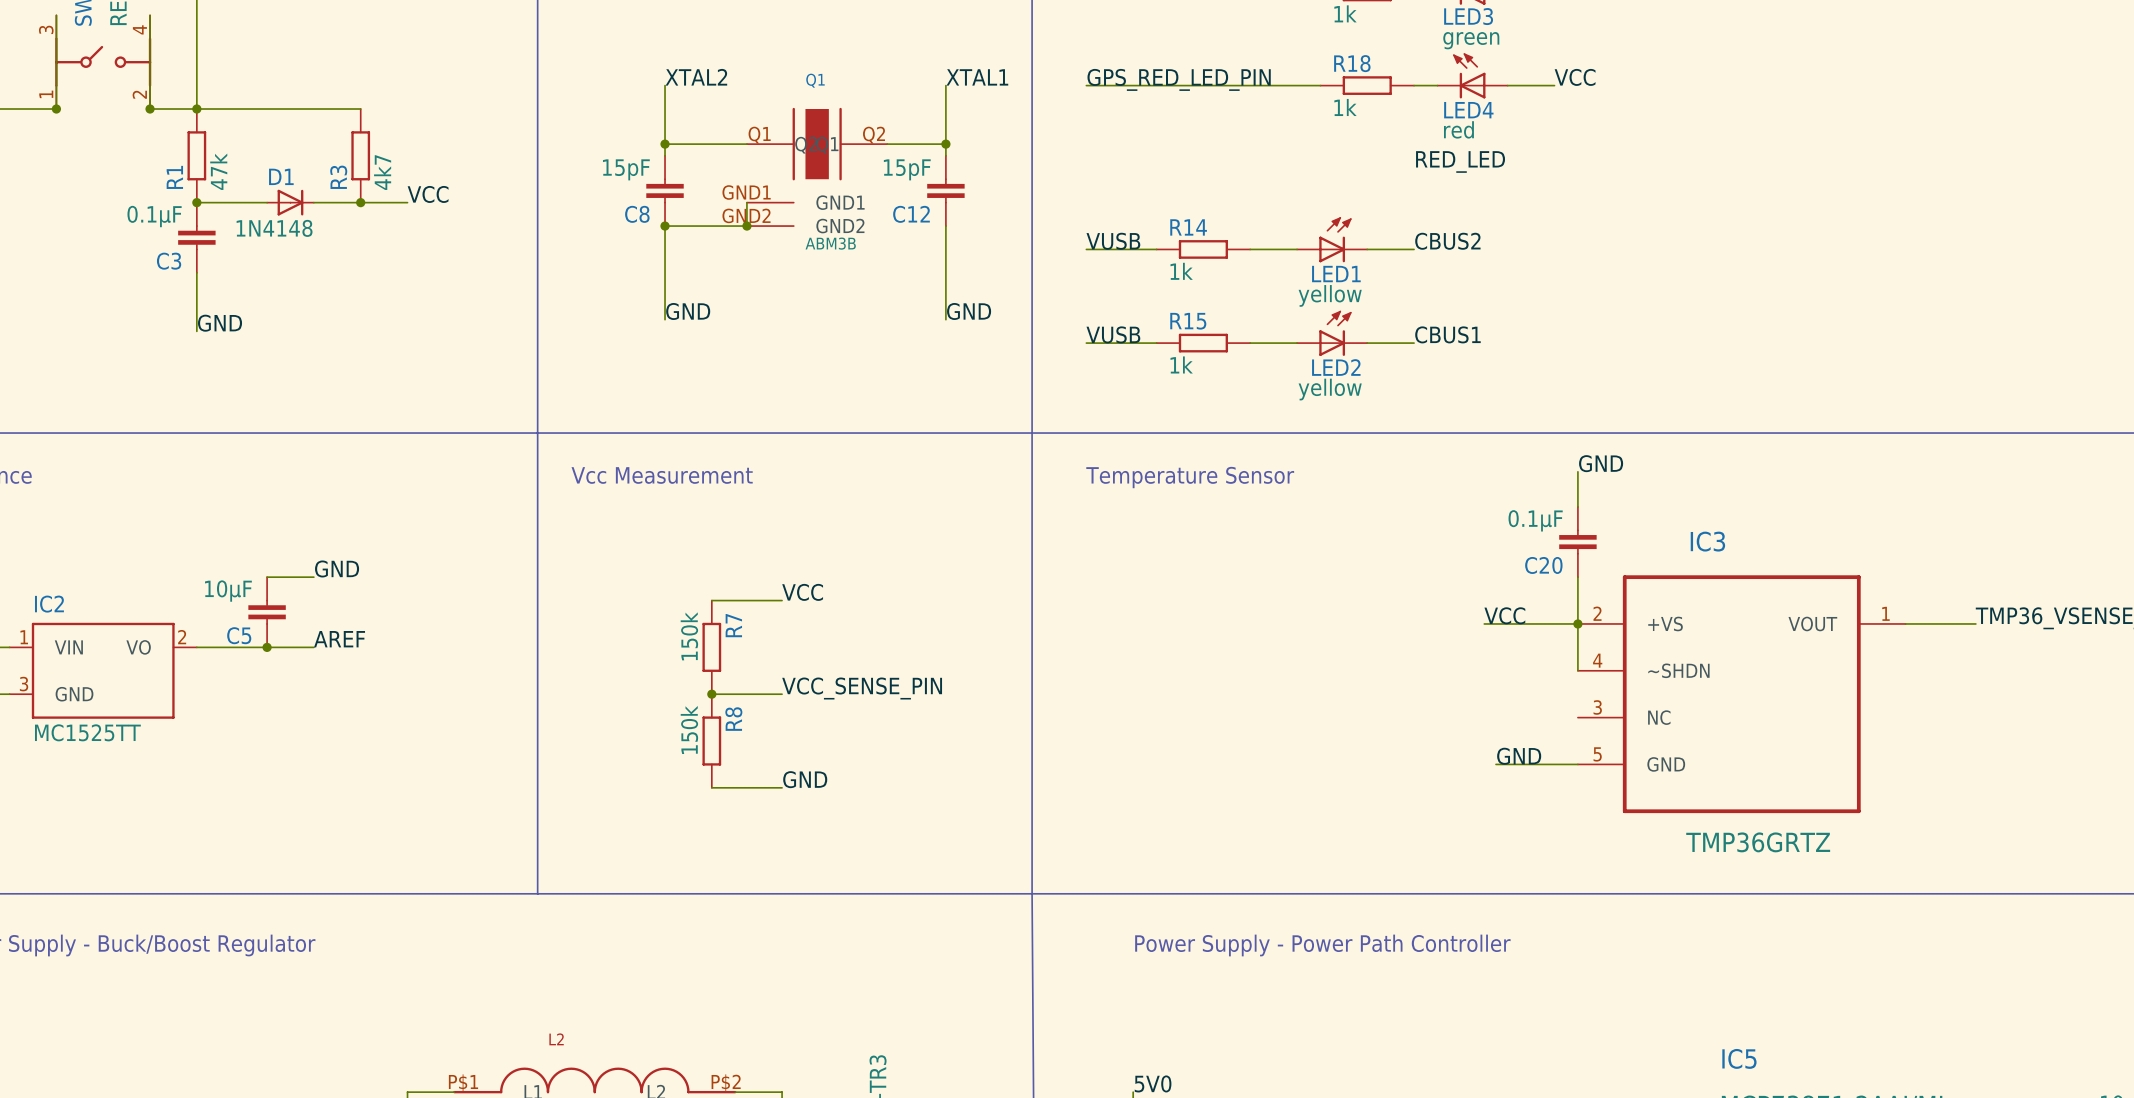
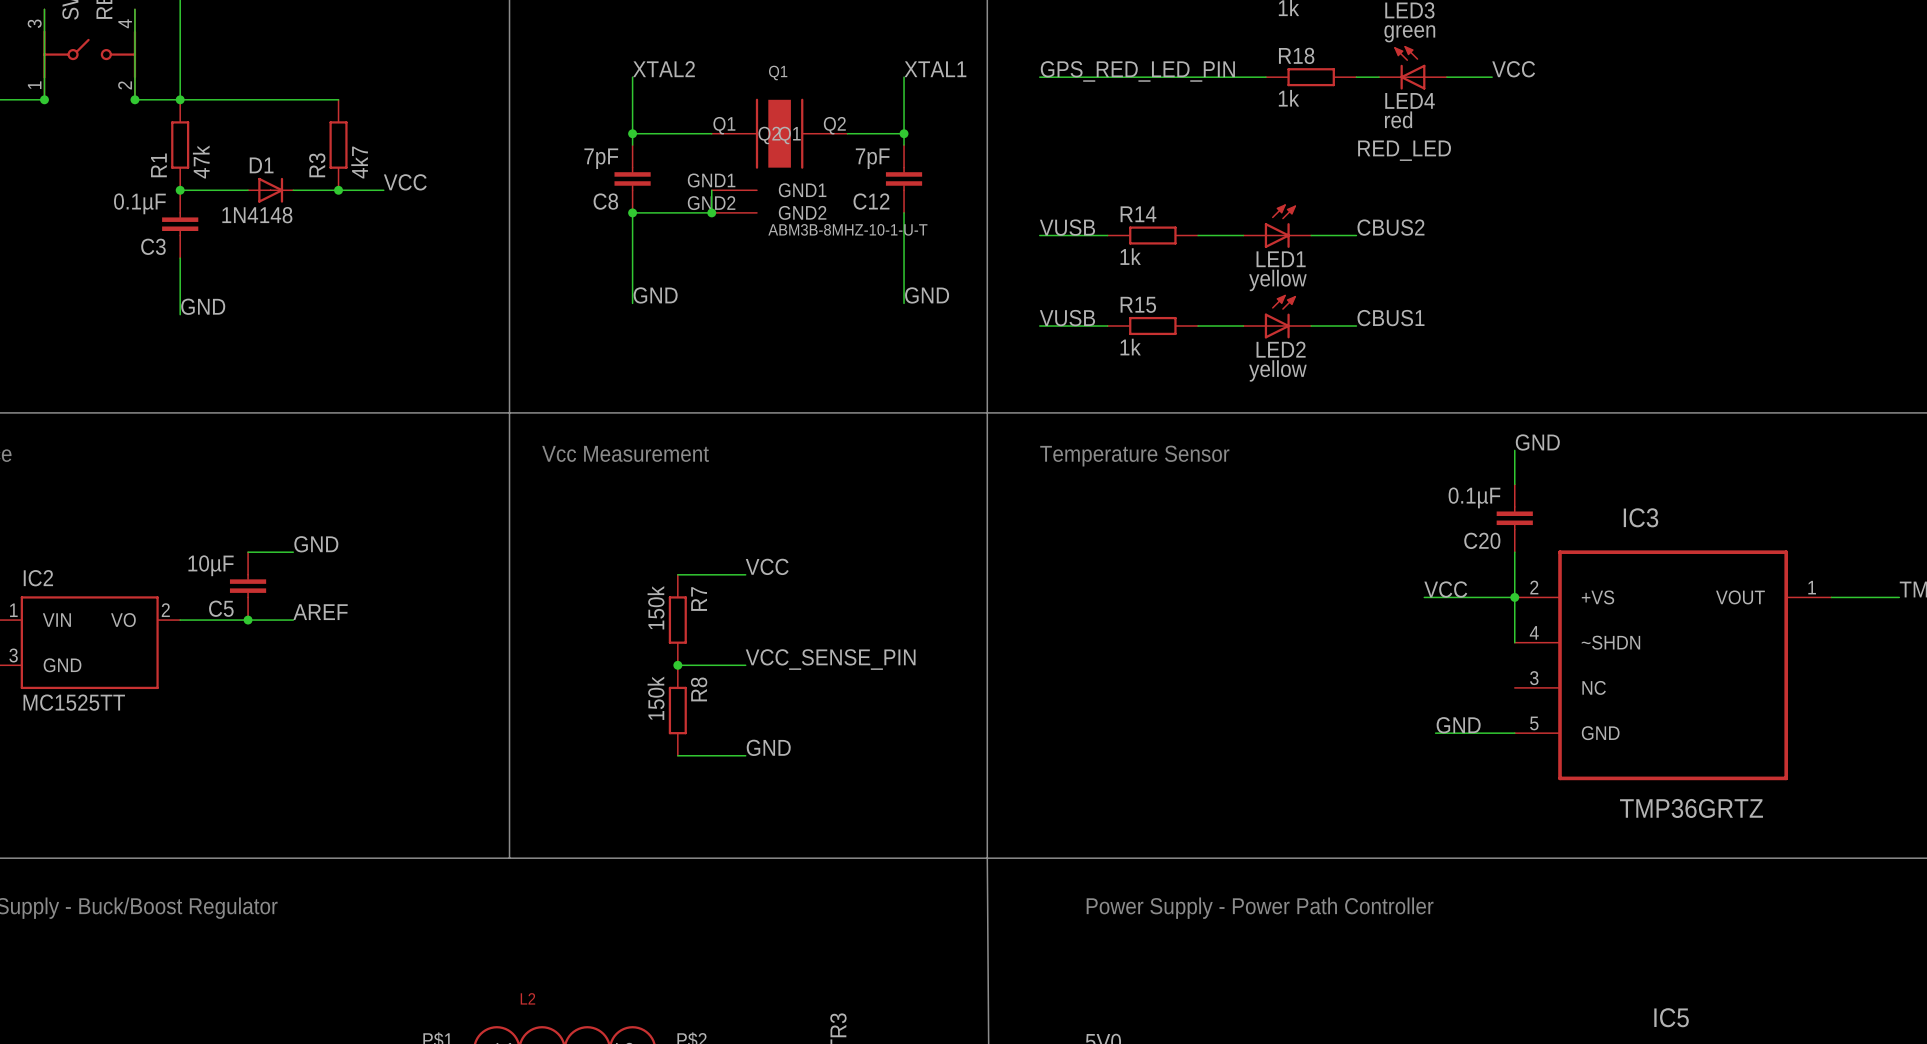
C8 value: 15pF (626, 169) -> 7pF (601, 158)
C12 value: 15pF (907, 169) -> 7pF (872, 158)
Q1 value: ABM3B (830, 243) -> ABM3B-8MHZ-10-1-U-T (847, 229)

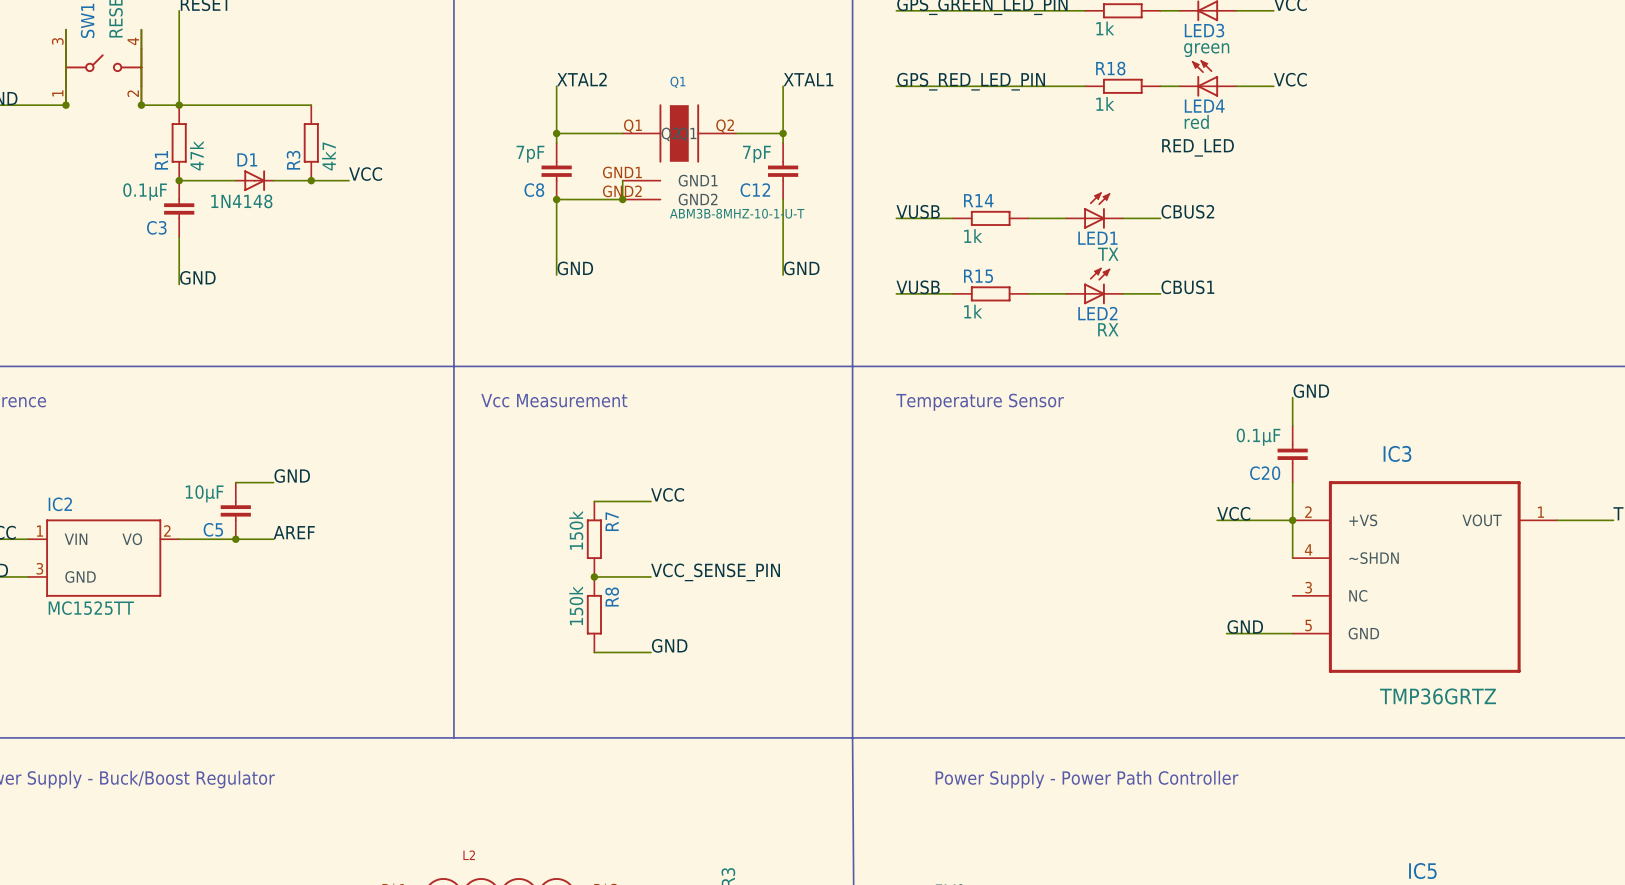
LED1 value: yellow (1277, 280) -> TX (1108, 254)
LED2 value: yellow (1277, 370) -> RX (1108, 329)

